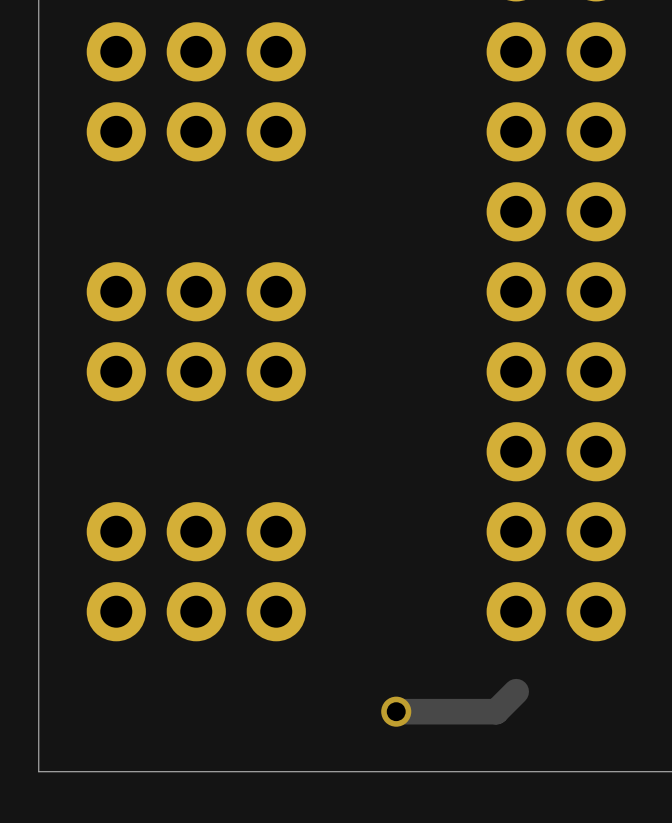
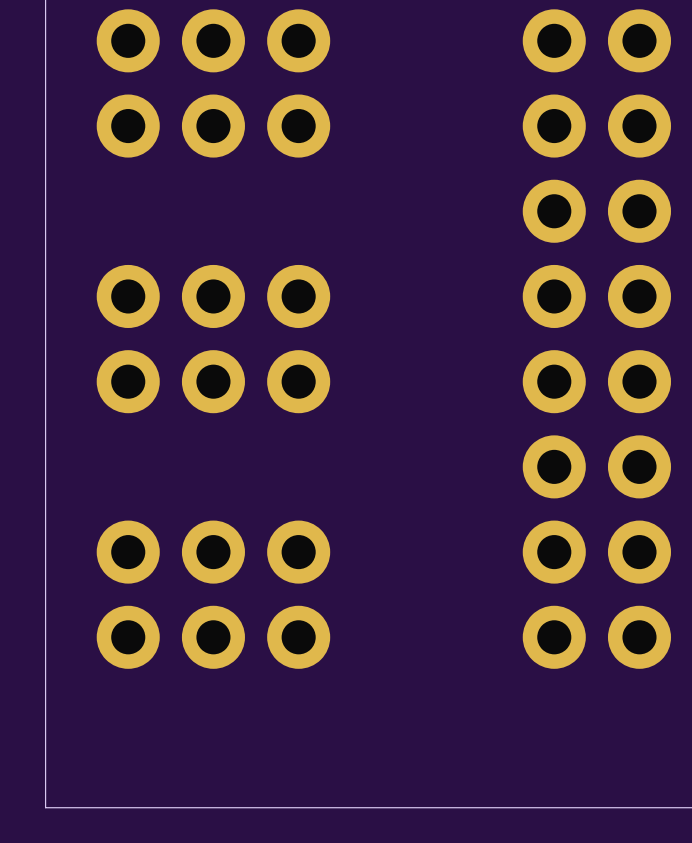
track: (516, 691) (496, 711) (396, 711) -> none
via: (396, 711) -> none

